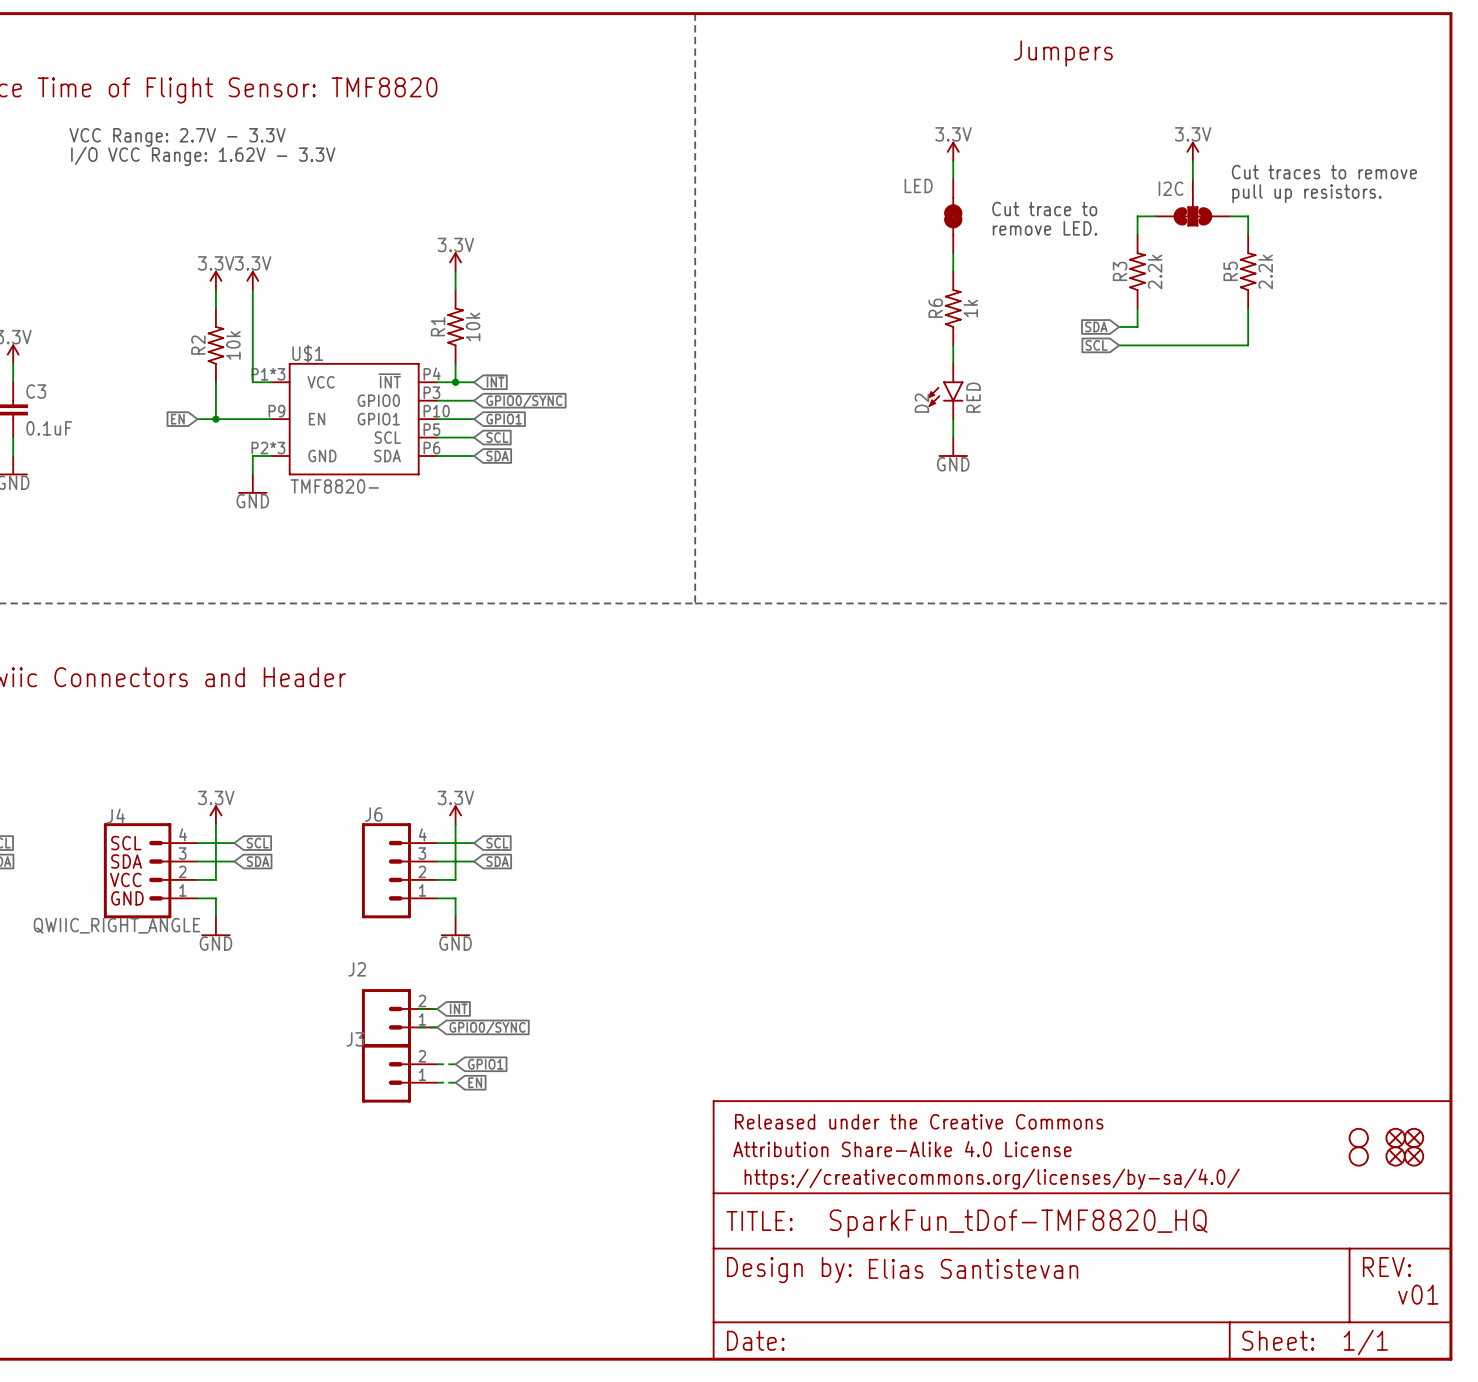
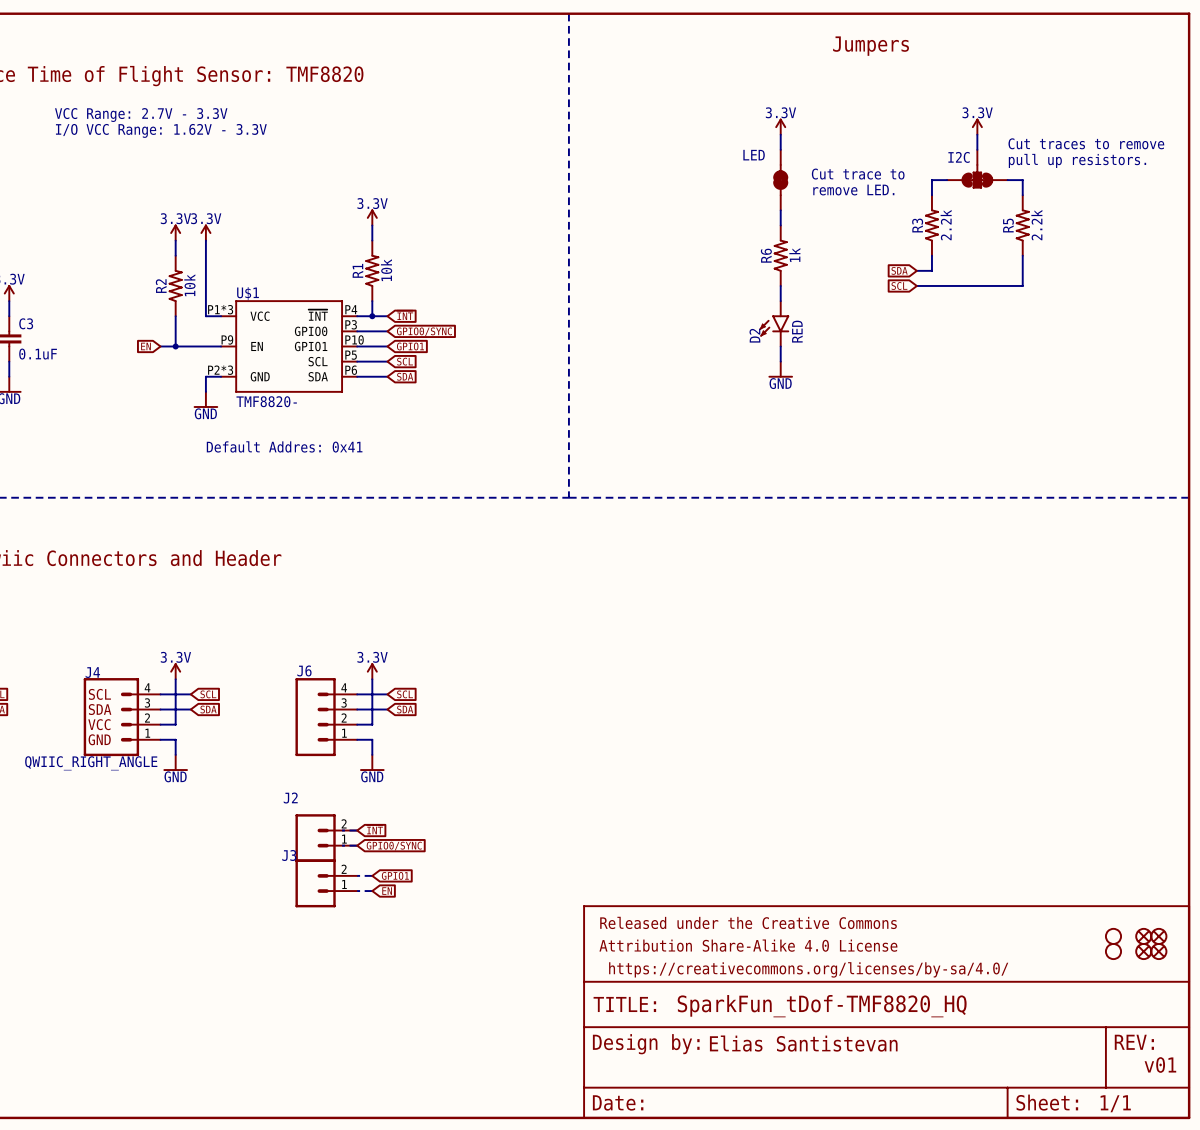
text: none -> Default Addres: 0x41 (284, 446)

